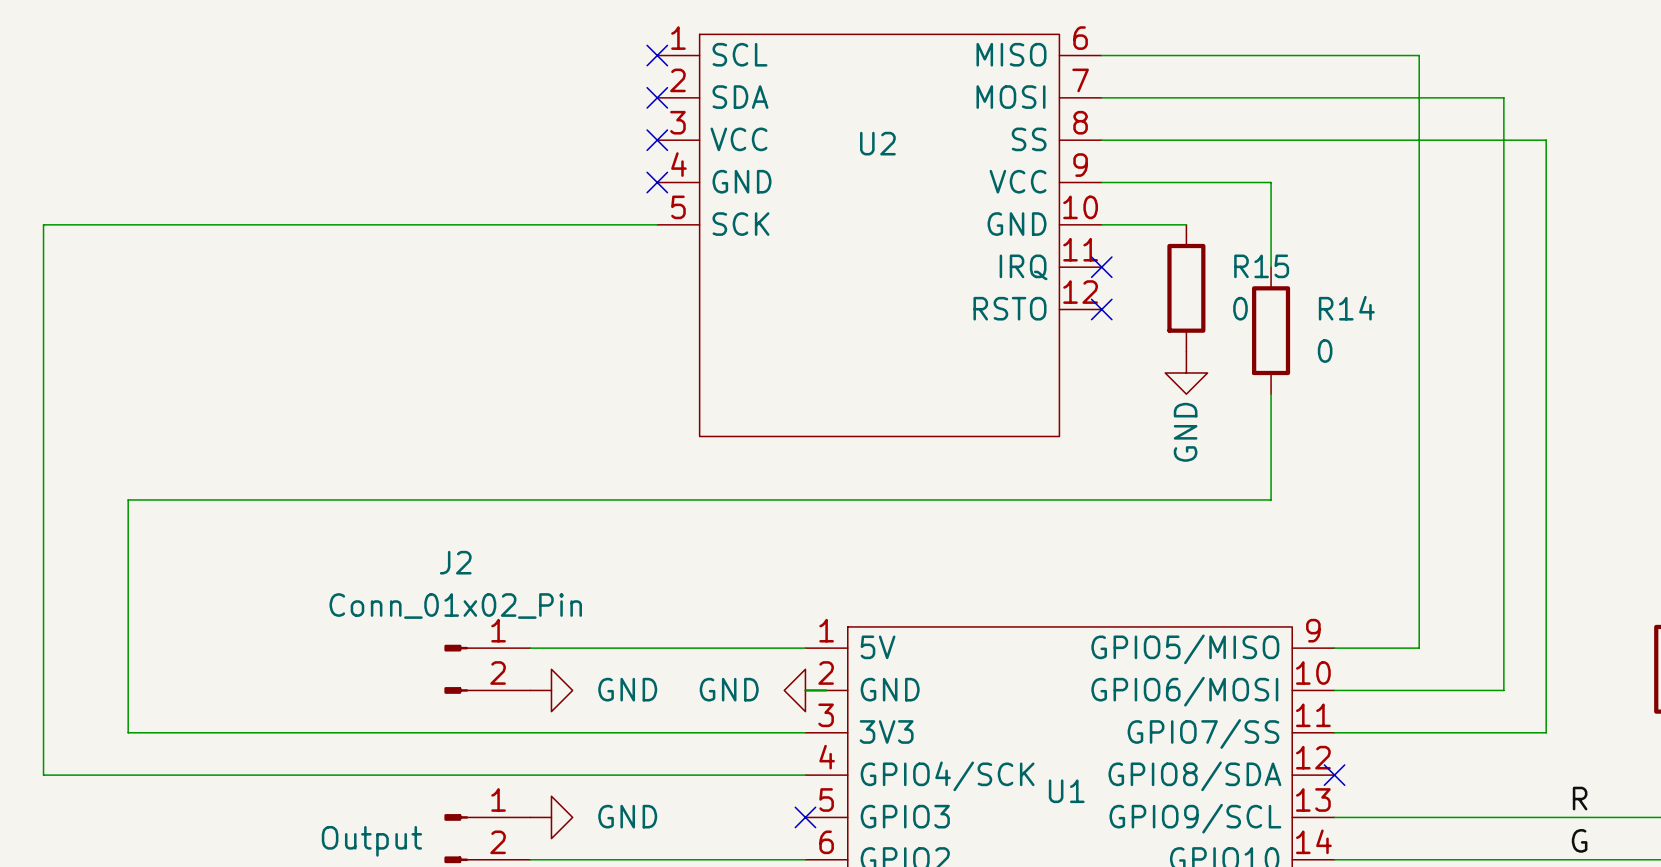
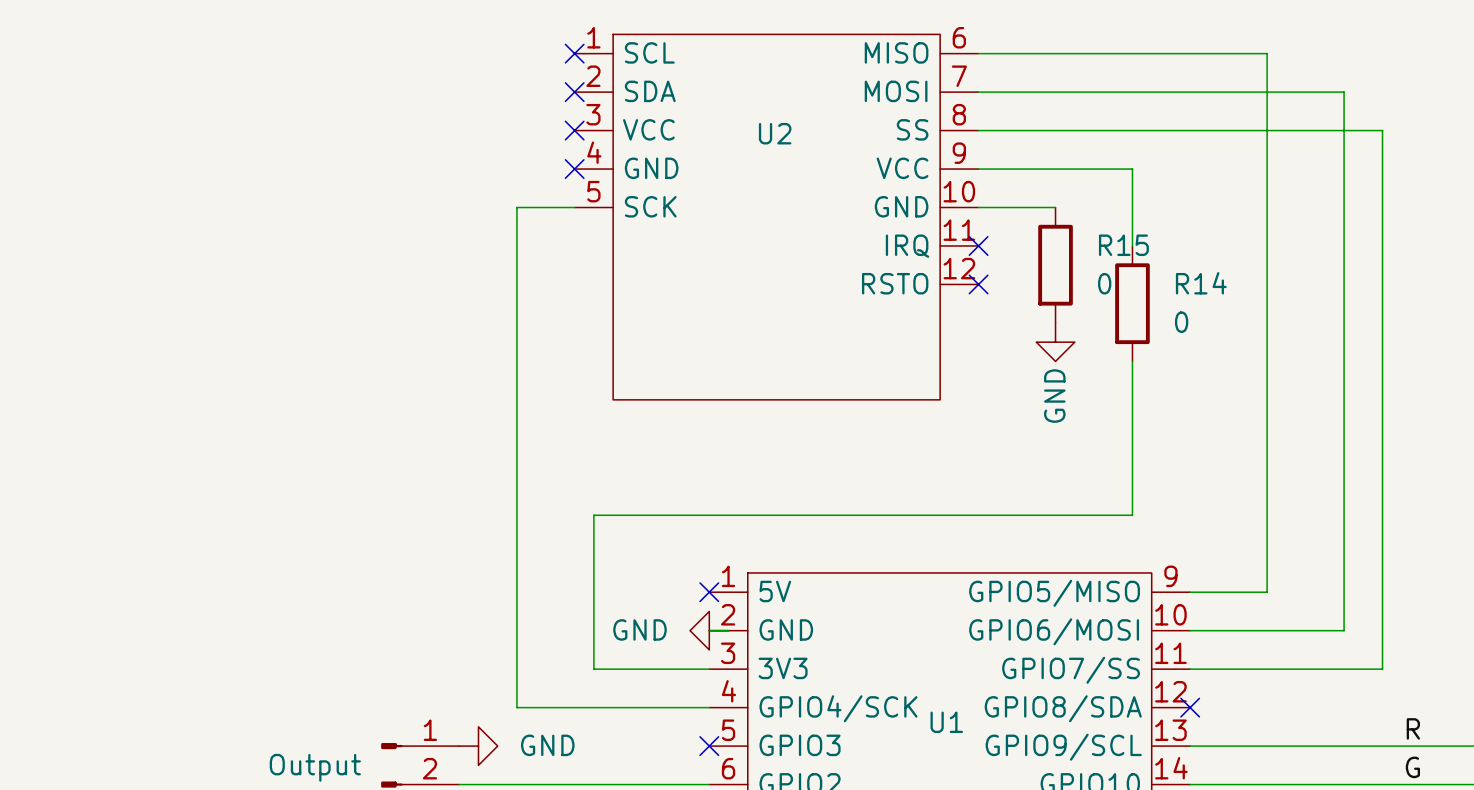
wire: (593, 224) (43, 224) (43, 775) (593, 775) -> (516, 207) (516, 707)
wire: (1271, 499) (128, 499) (128, 732) (678, 732) -> (1132, 457) (1132, 515) (593, 515) (593, 669)
wire: (530, 648) (805, 648) -> none
no-connect mark: none -> (709, 592)
J2: Conn_01x02_Pin (487, 669) -> none
power symbol: GND (551, 690) -> none

